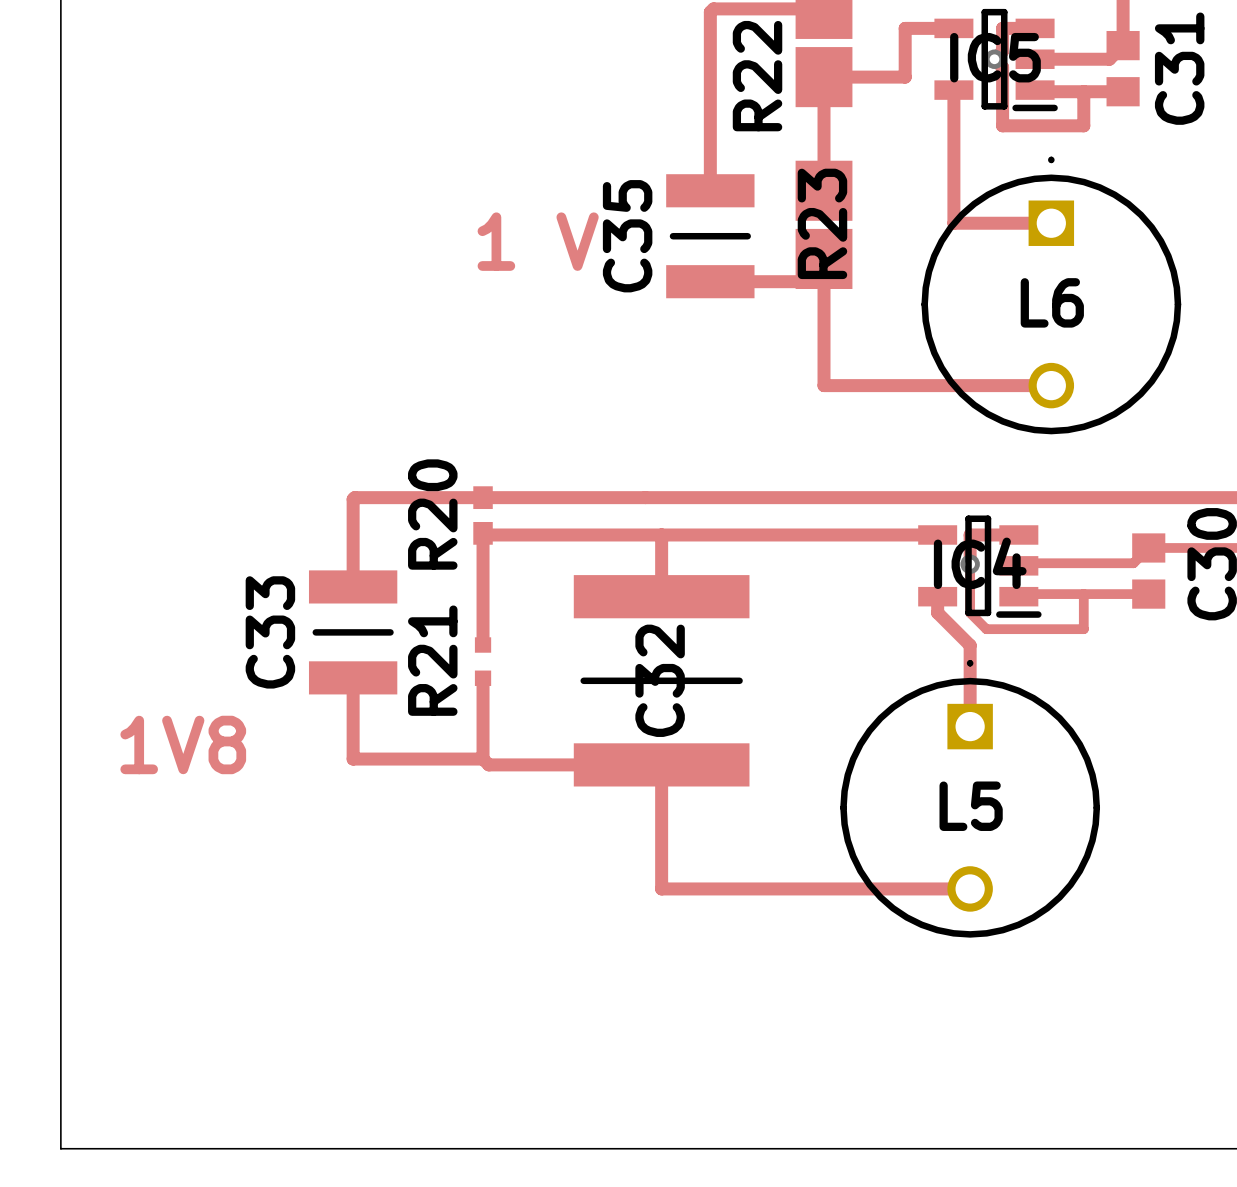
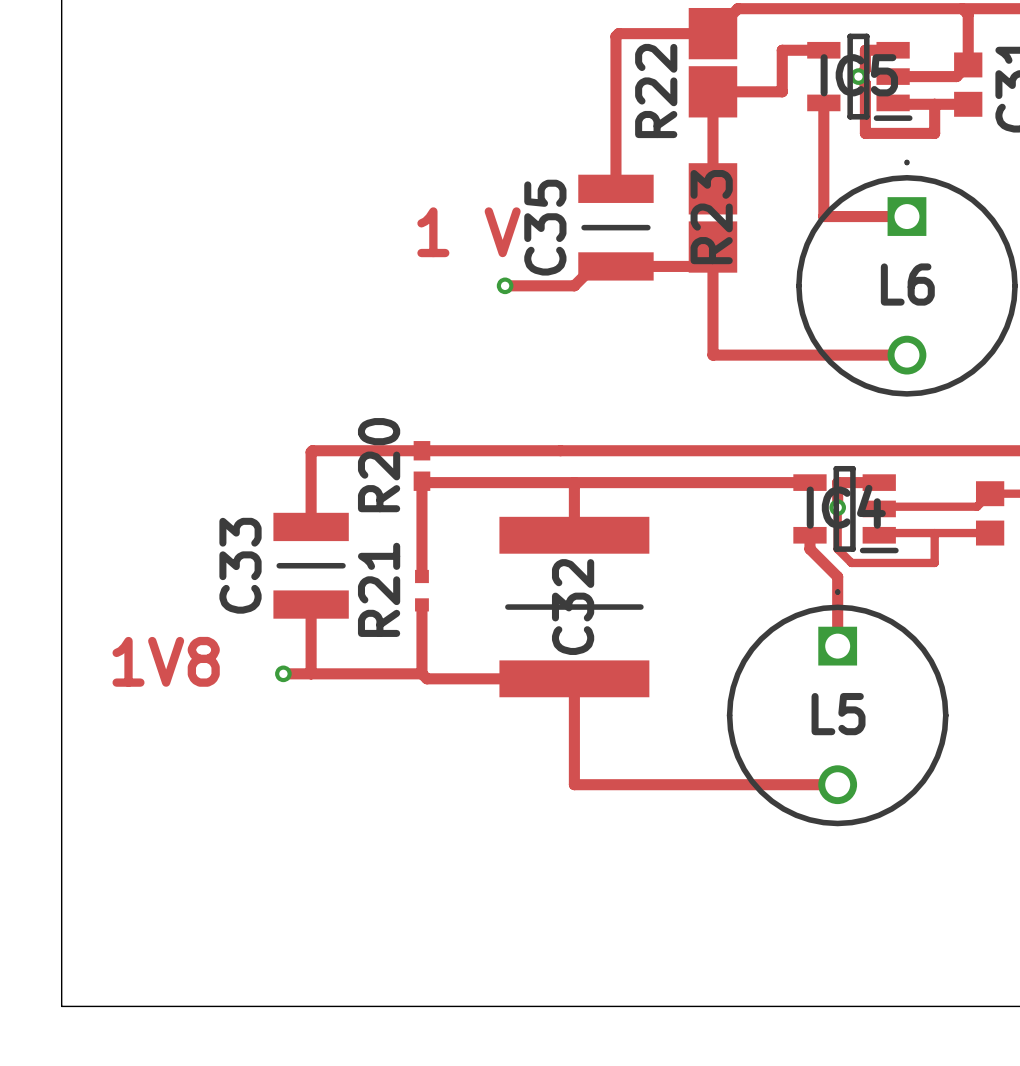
track: none -> (615, 266) (593, 266) (574, 285) (505, 285)
via: none -> (505, 285)
track: none -> (283, 673) (311, 673)
via: none -> (283, 673)

